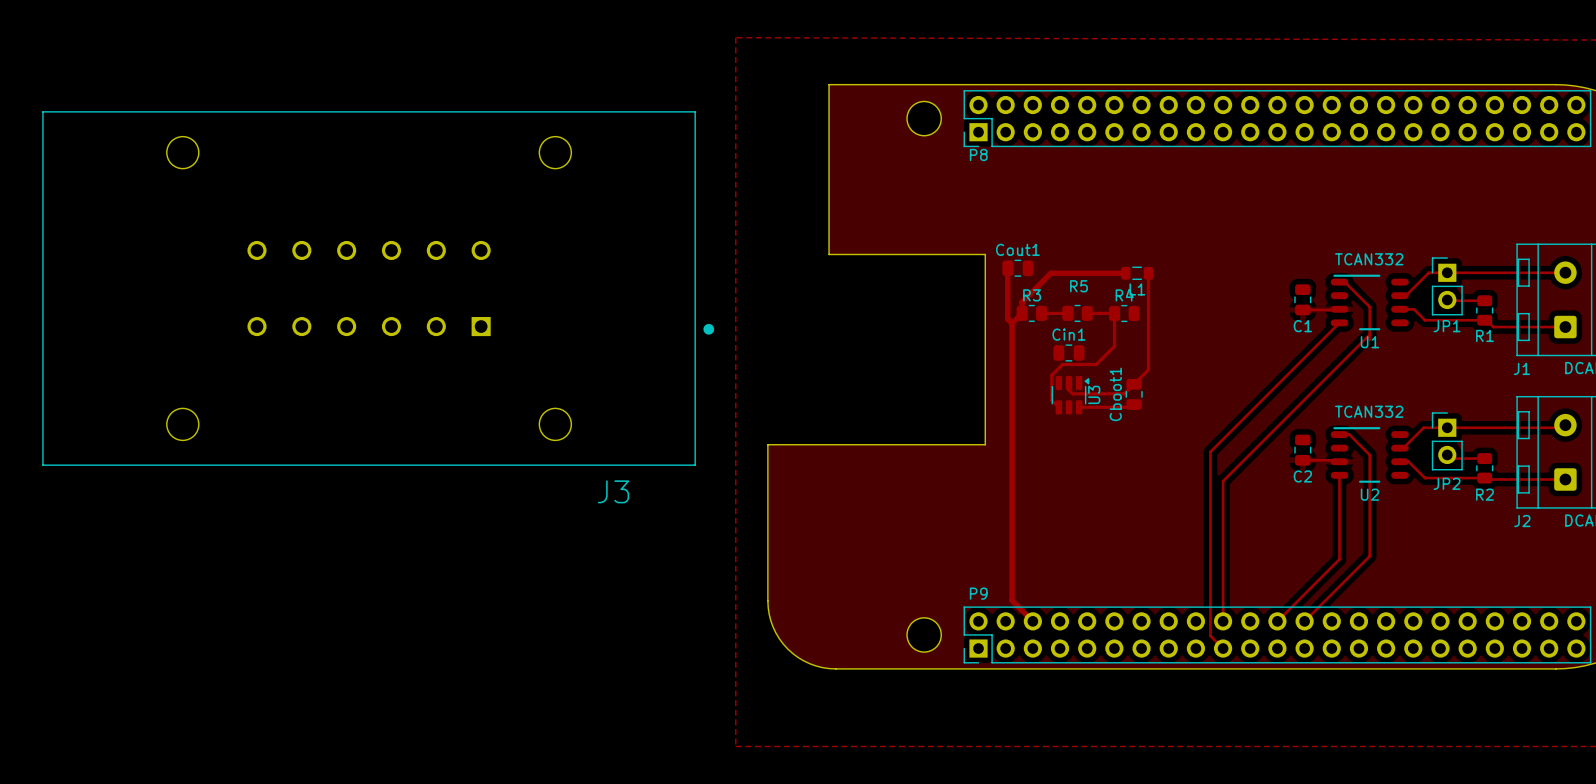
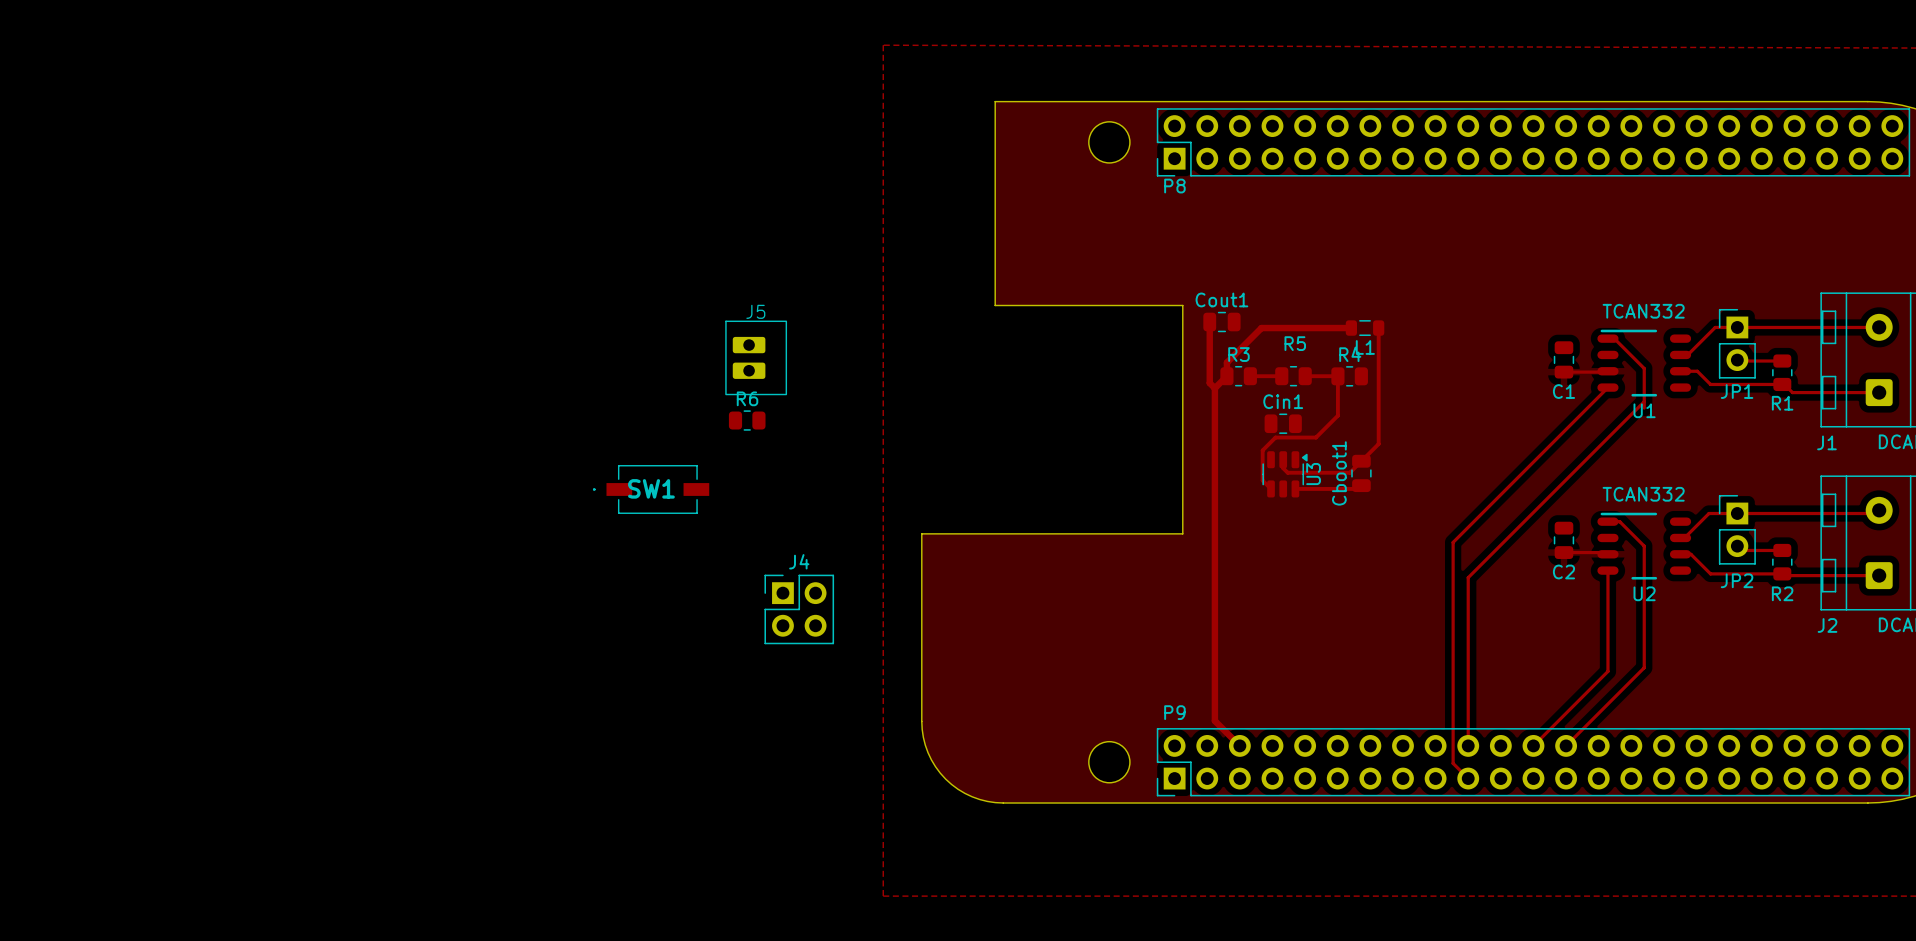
J3: (378, 288) -> none
J5: none -> (756, 357)
R6: none -> (747, 420)
SW1: none -> (651, 489)
J4: none -> (799, 609)

